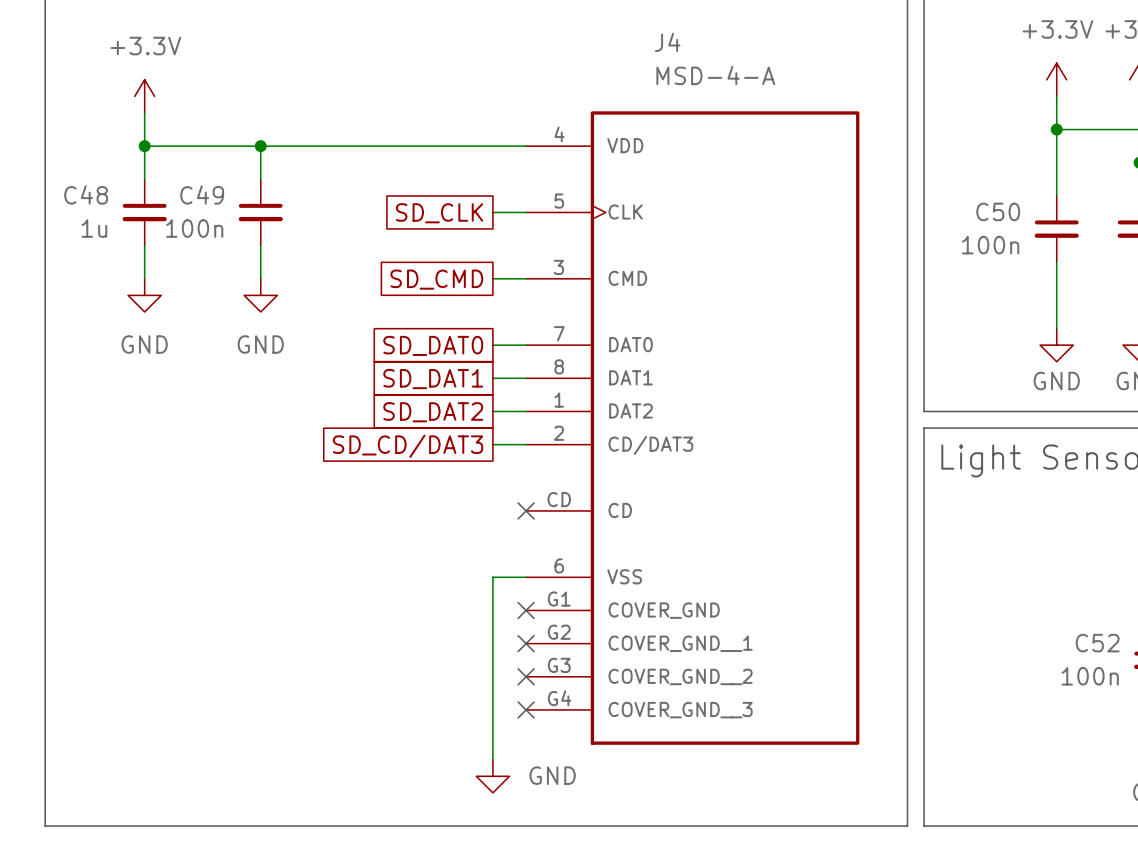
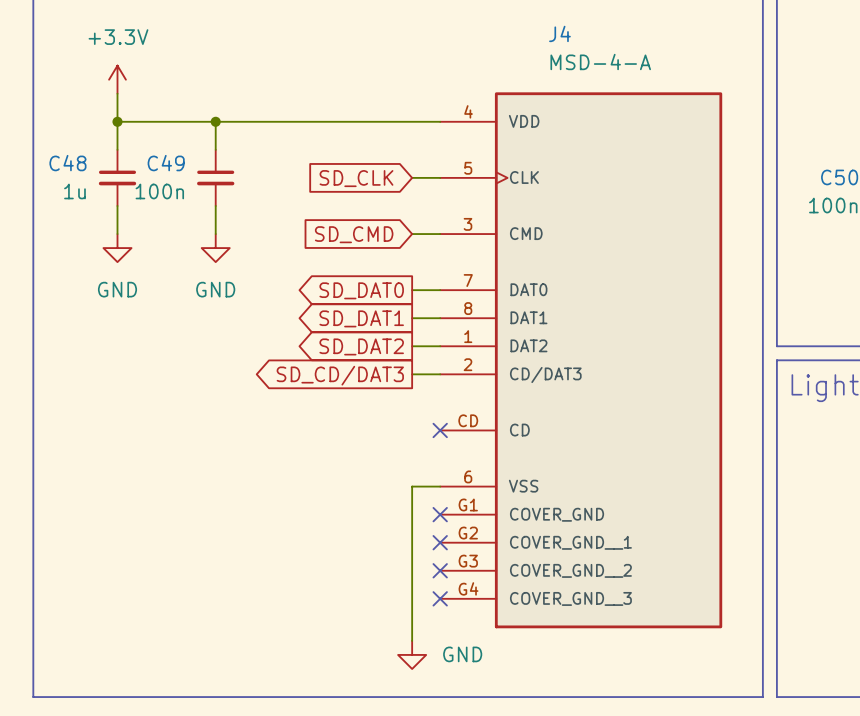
global label shape: passive (439, 213) -> input (356, 178)
global label shape: passive (436, 279) -> input (354, 234)
global label shape: passive (433, 345) -> output (361, 290)
global label shape: passive (433, 379) -> output (361, 318)
global label shape: passive (433, 412) -> output (361, 346)
global label shape: passive (408, 446) -> output (340, 375)

